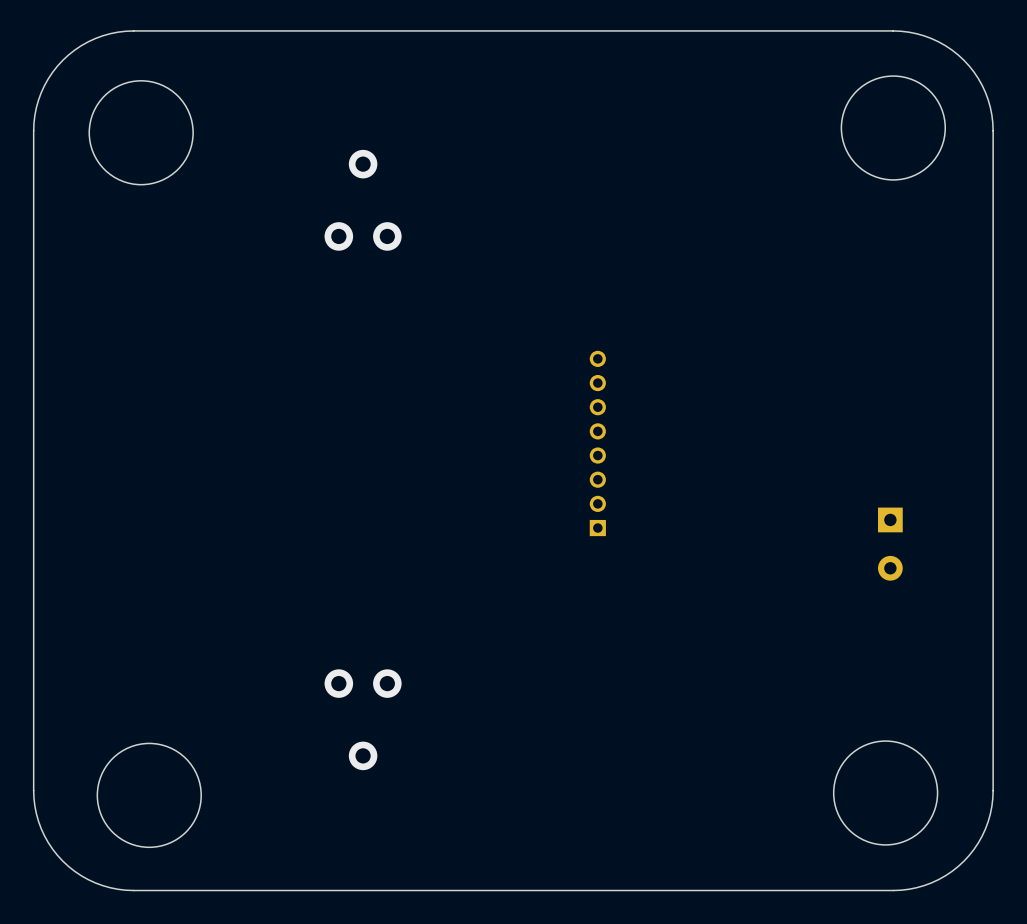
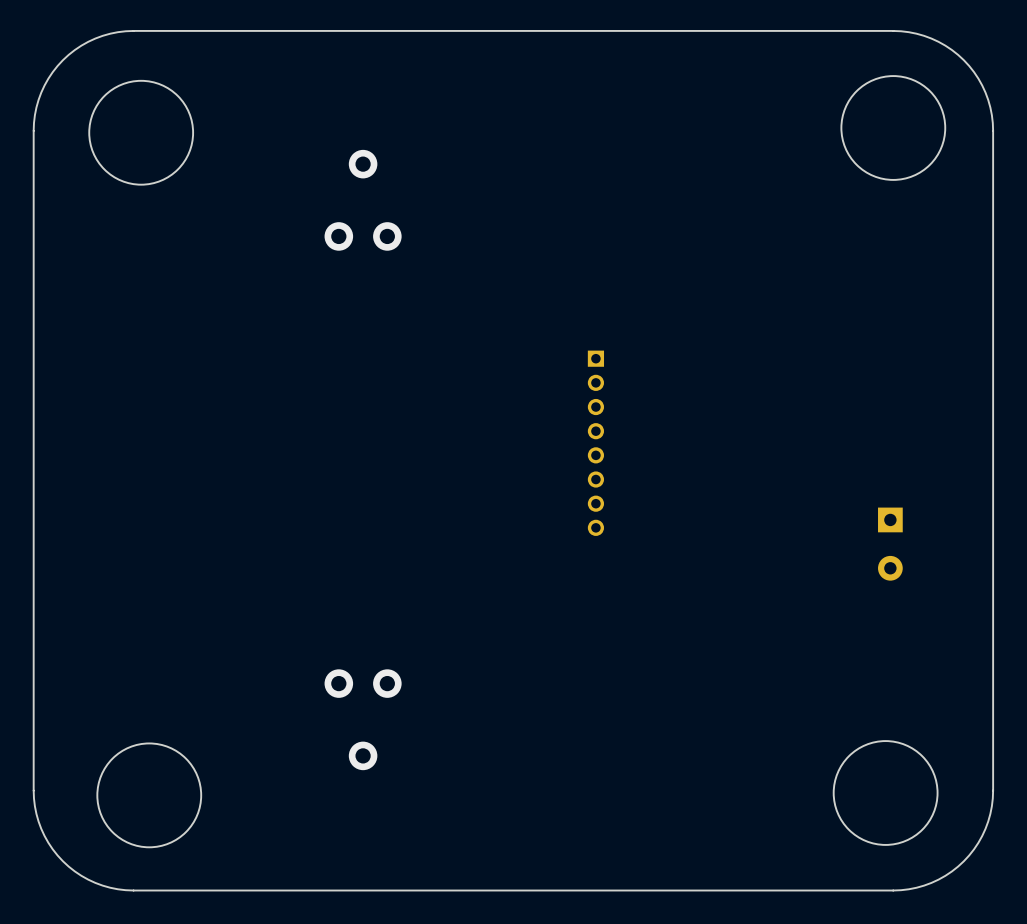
part rotation: 0° (597, 443) -> 180° (595, 443)

